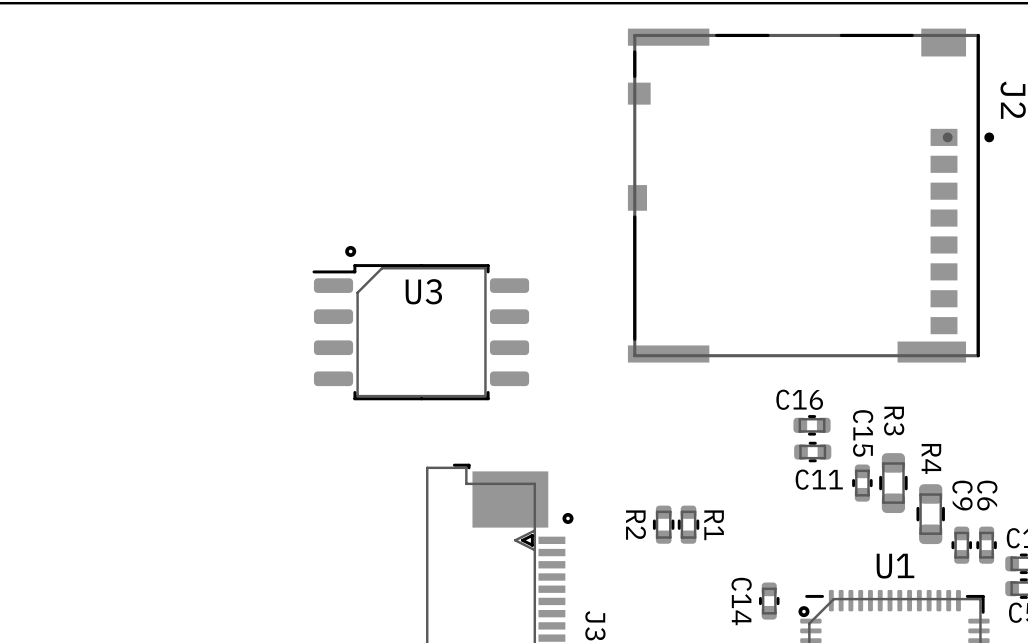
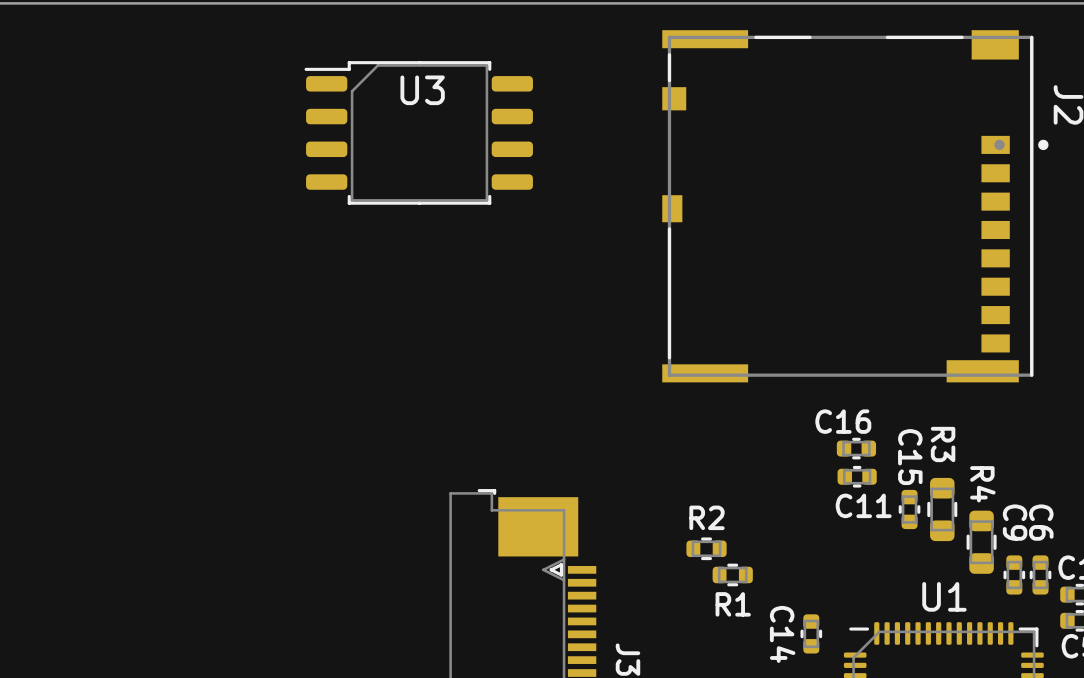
drawing: [345, 245, 357, 257] -> none
U3 position: (420, 332) -> (418, 132)
drawing: [562, 512, 574, 524] -> none
R2 rotation: 0° (663, 524) -> 90° clockwise (706, 548)
R1 rotation: 0° (688, 524) -> 90° clockwise (732, 574)
drawing: [798, 606, 810, 618] -> none

